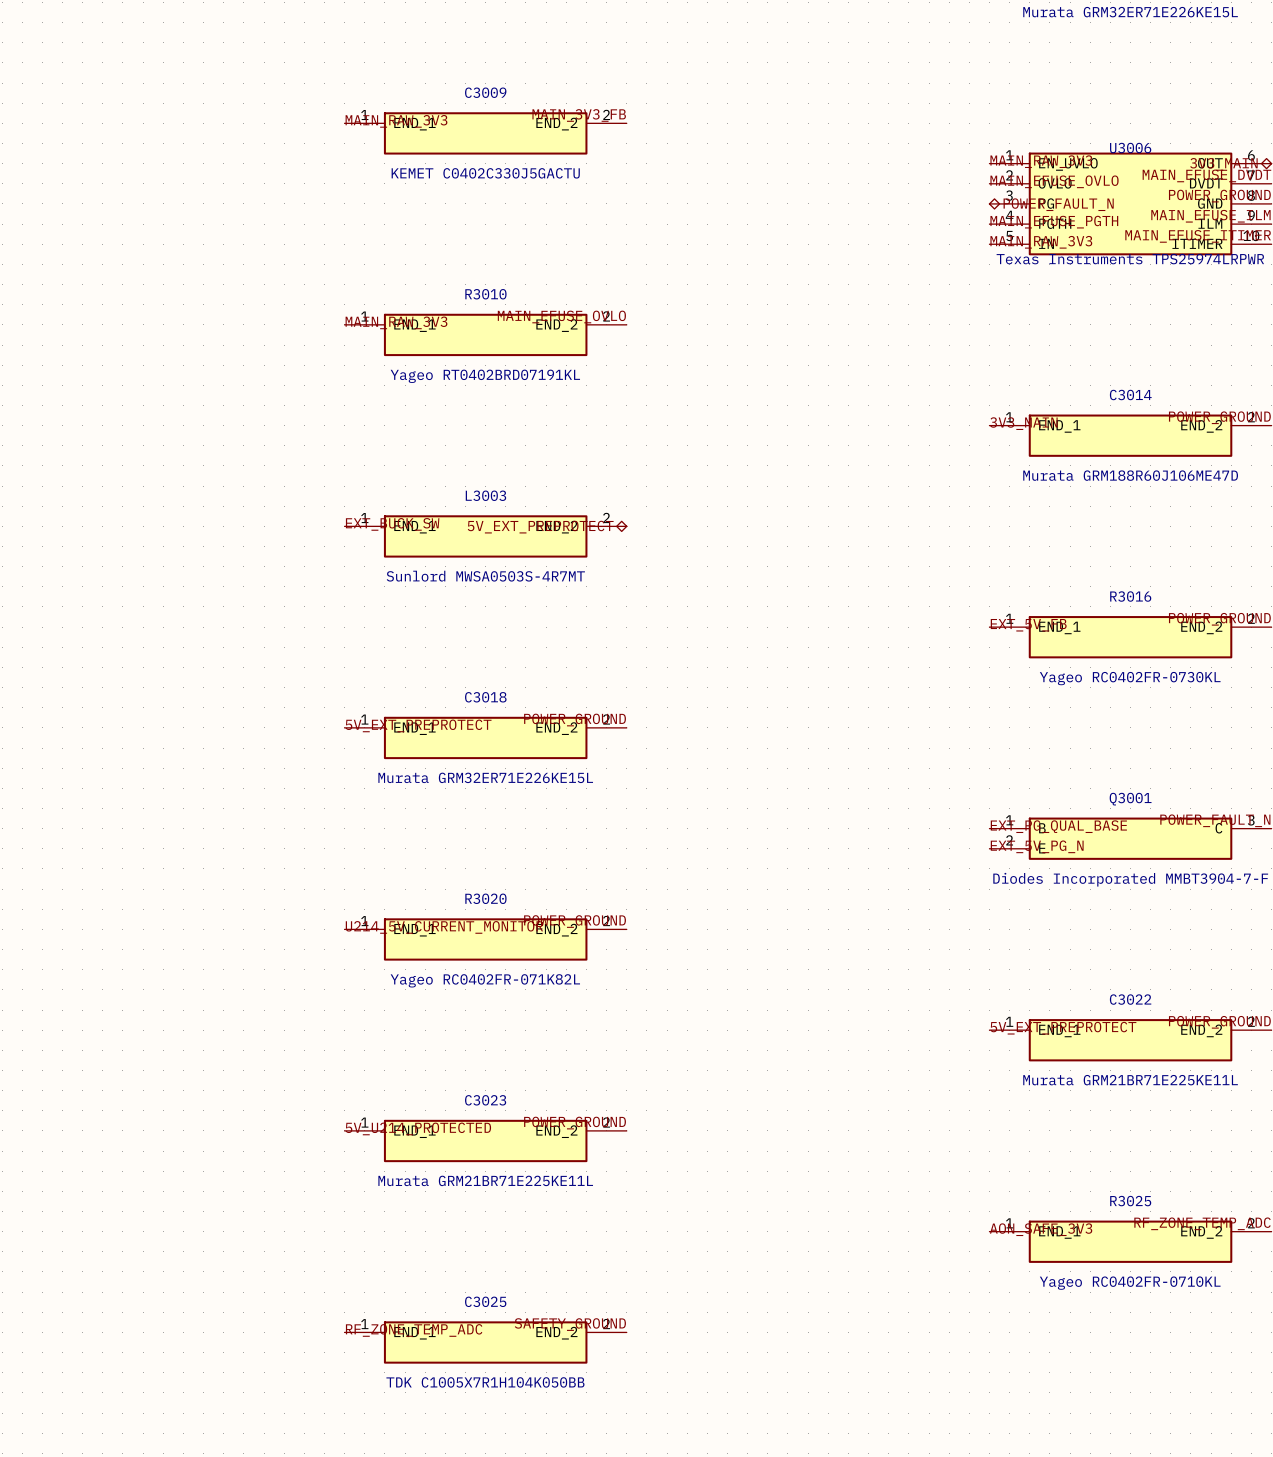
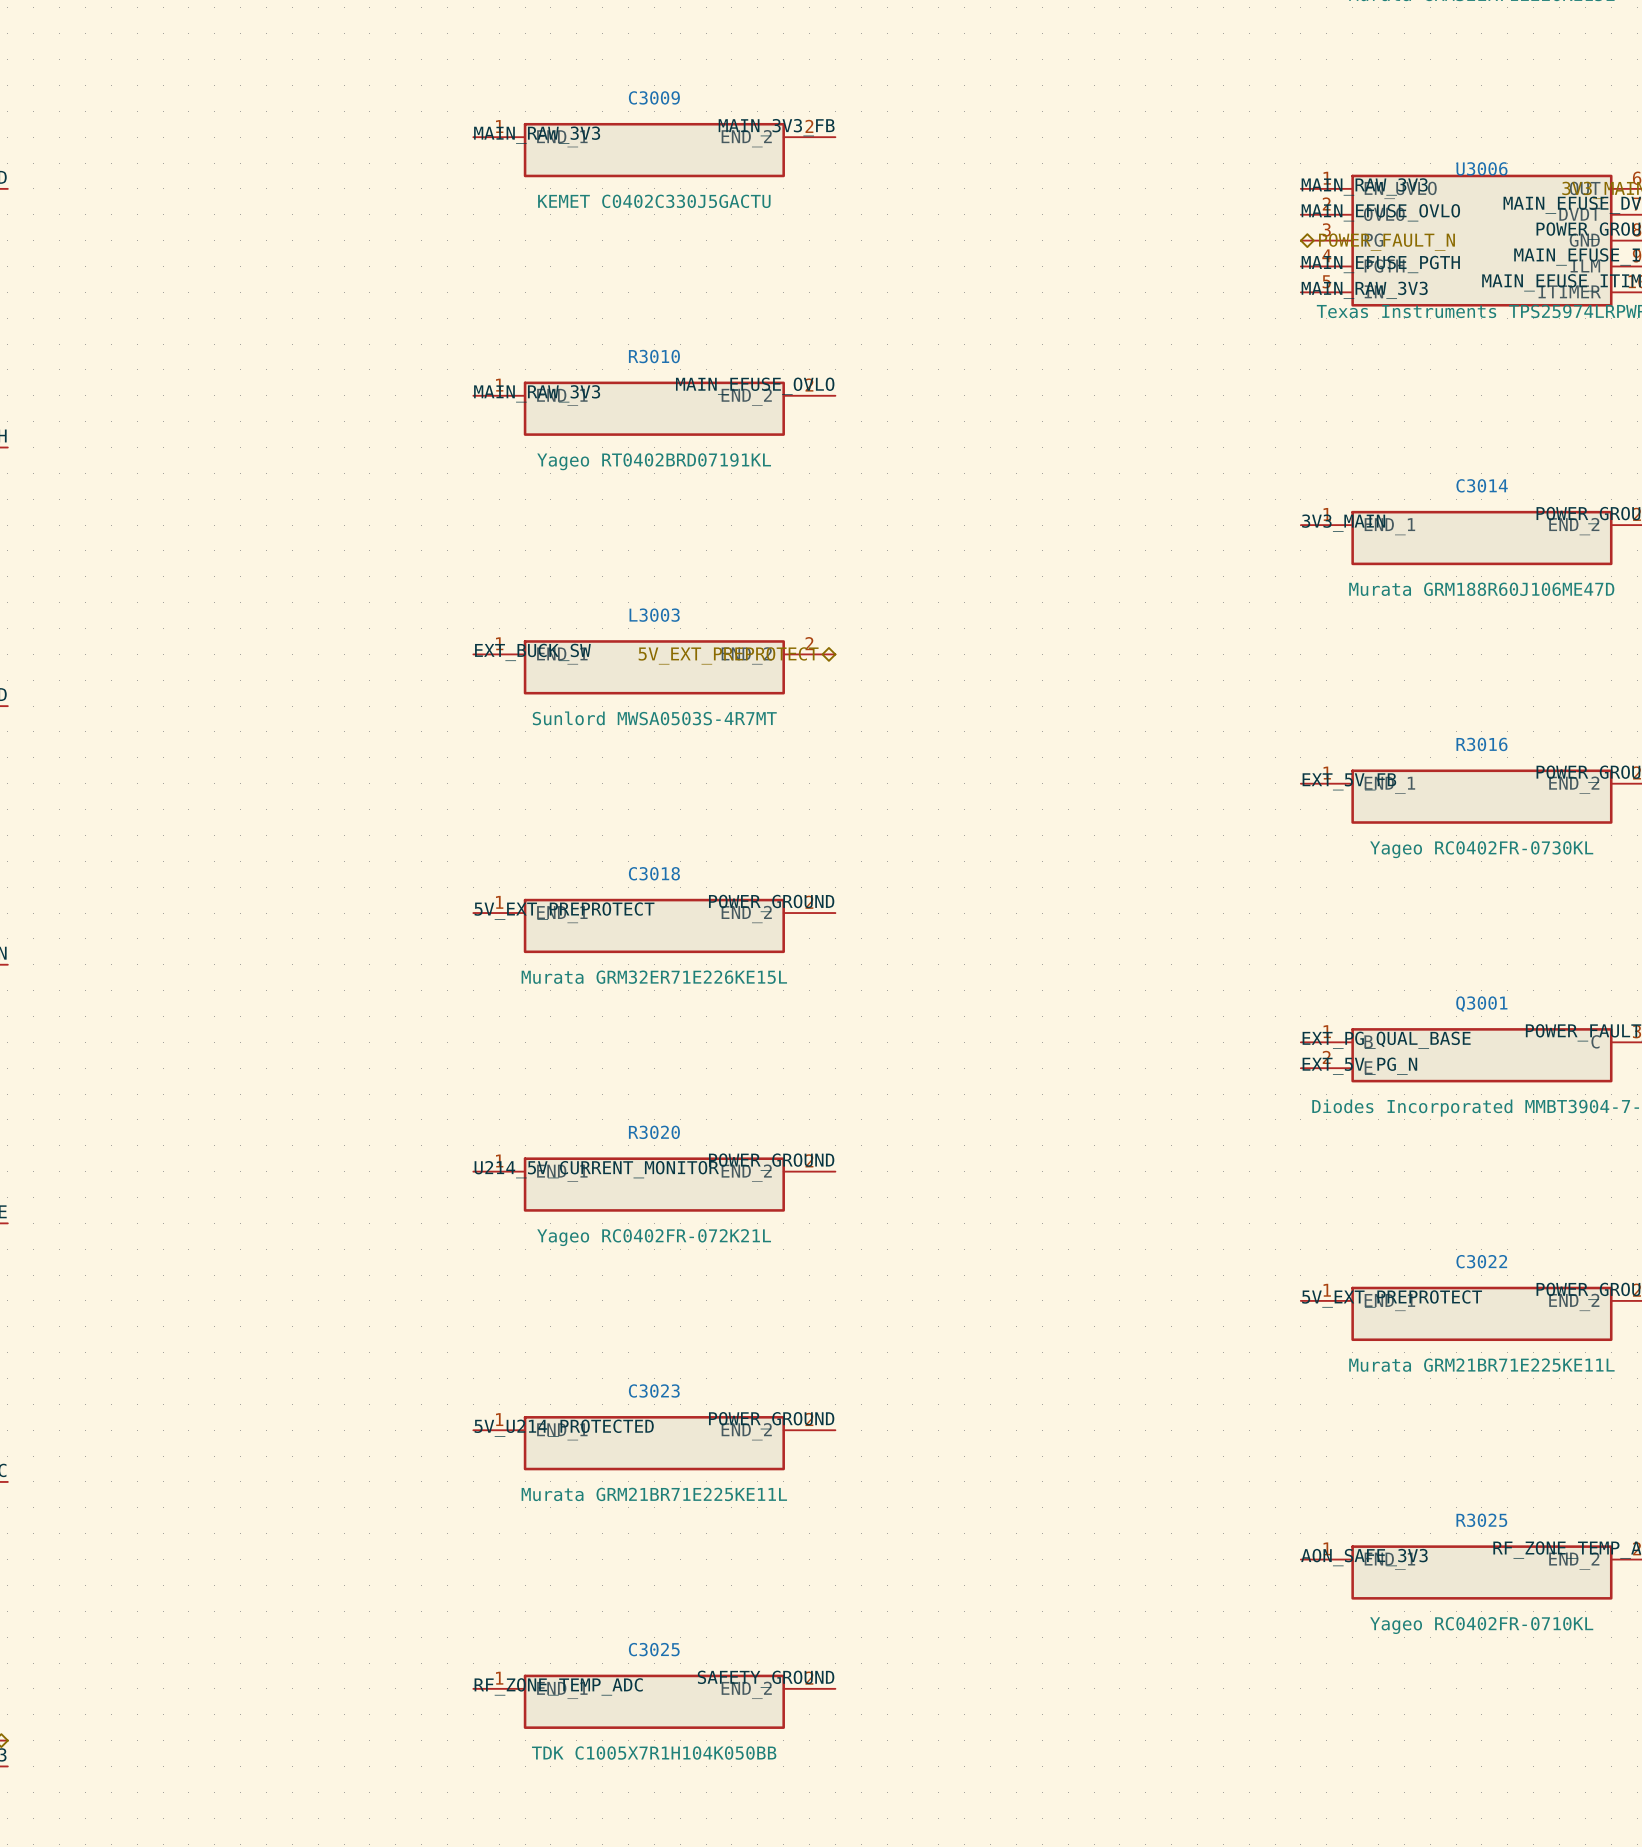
R3020 value: Yageo RC0402FR-071K82L (485, 980) -> Yageo RC0402FR-072K21L (654, 1237)

